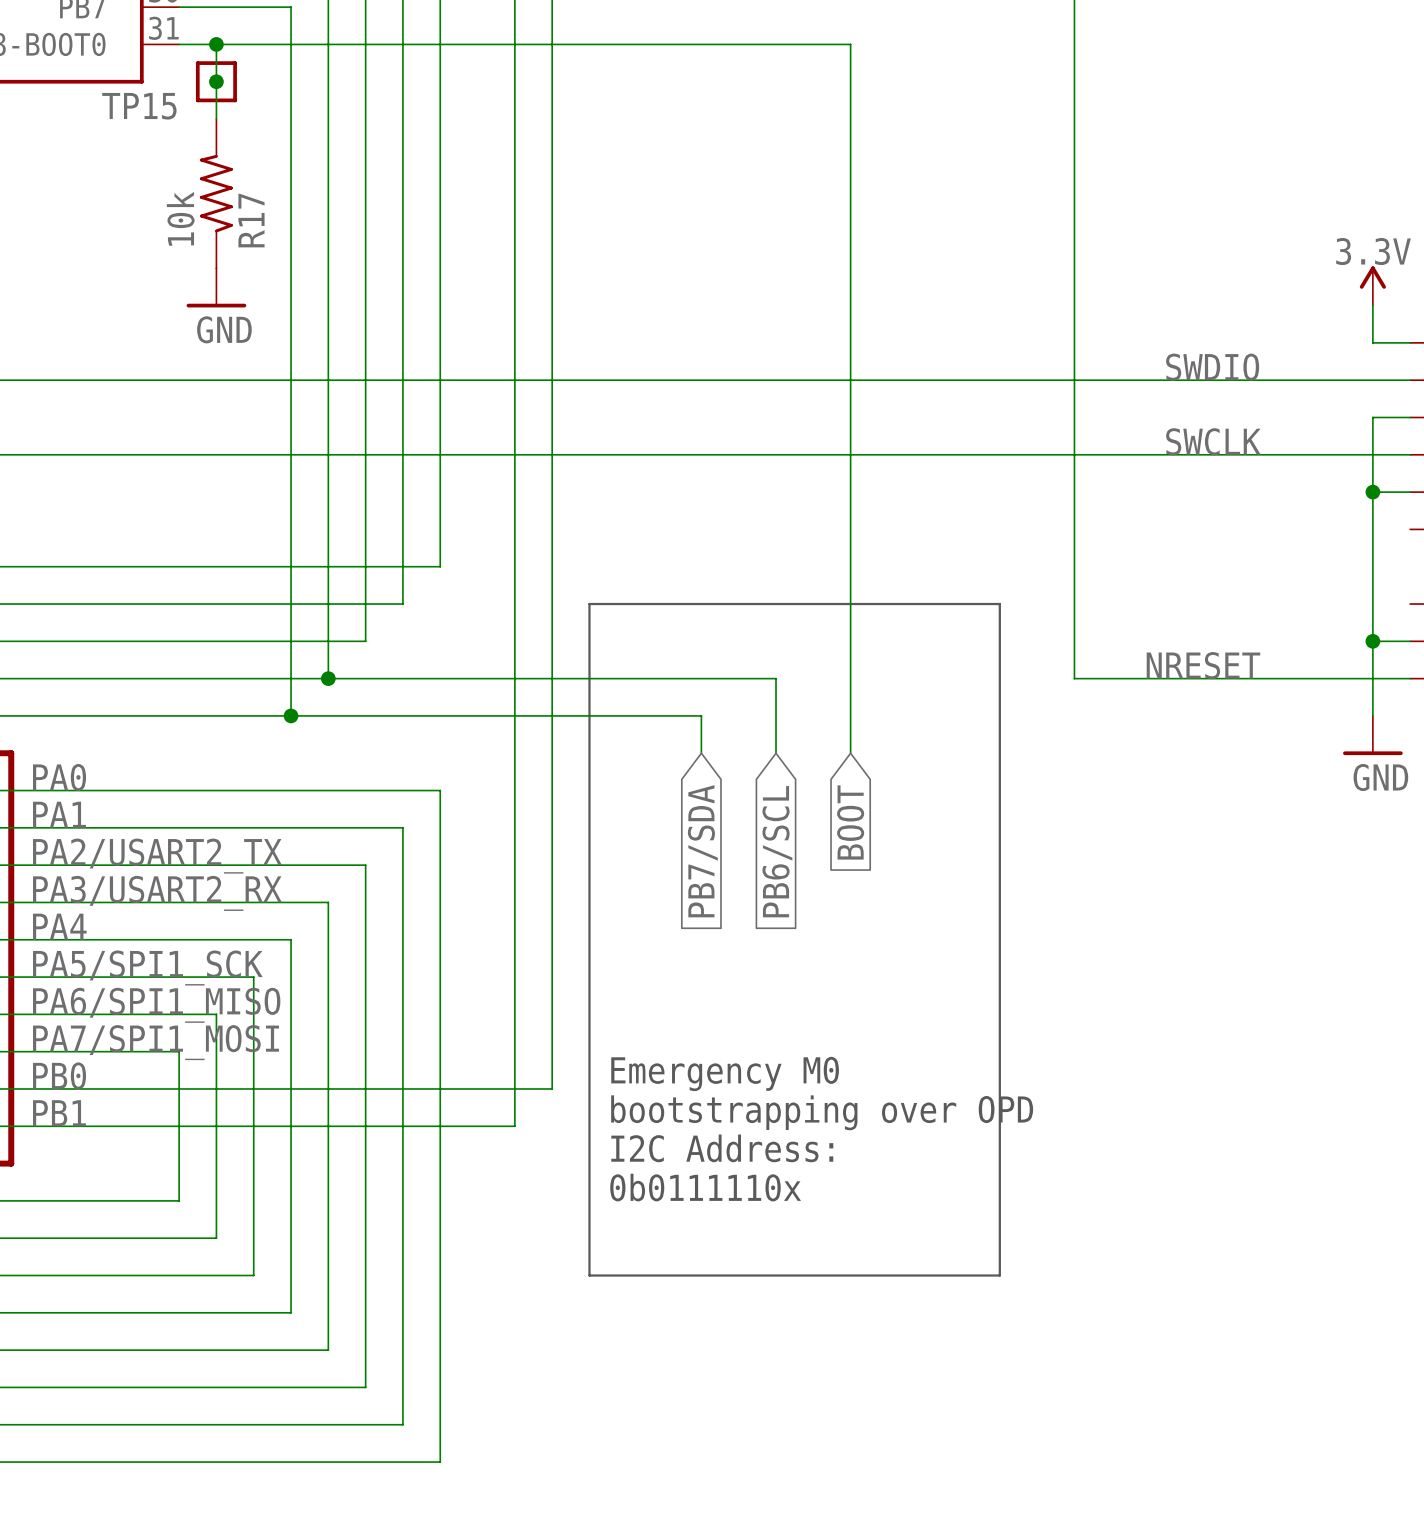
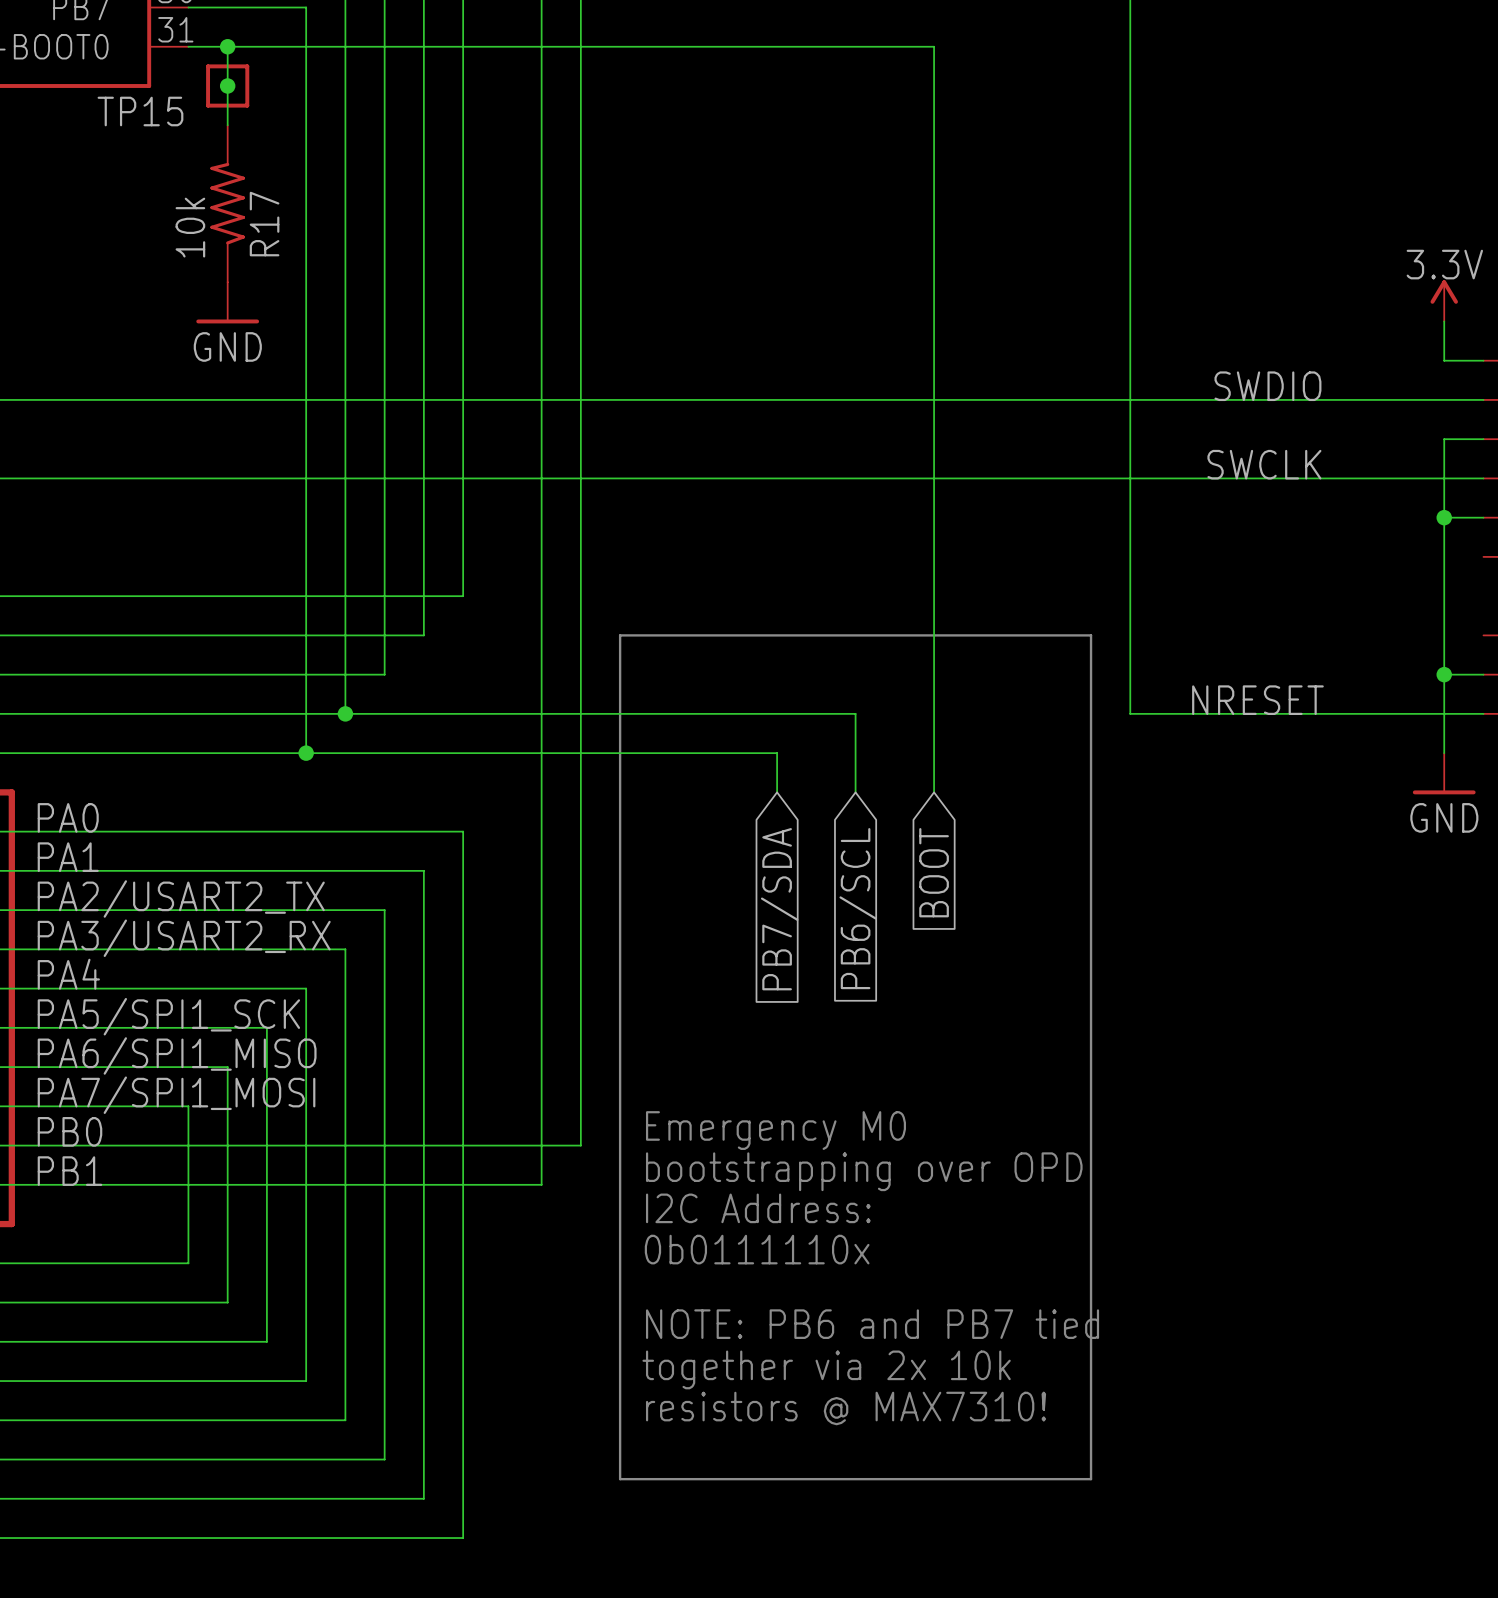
wire: (850, 44) (850, 753) -> (894, 46) (934, 46) (934, 792)
line: (999, 604) (999, 1275) (589, 1275) -> (1051, 635) (1091, 635) (1091, 1479) (620, 1479) (620, 1341)
wire: (776, 678) (776, 753) -> (816, 713) (855, 713) (855, 792)
wire: (701, 715) (701, 753) -> (737, 753) (777, 753) (777, 792)
global label position: BOOT (850, 822) -> BOOT (934, 872)
global label position: PB7/SDA (702, 851) -> PB7/SDA (779, 909)
global label position: PB6/SCL (777, 851) -> PB6/SCL (858, 908)
text: none -> NOTE: PB6 and PB7 tied (872, 1324)
text: none -> together via 2x 10k (826, 1369)
text: none -> resistors @ MAX7310! (846, 1408)

